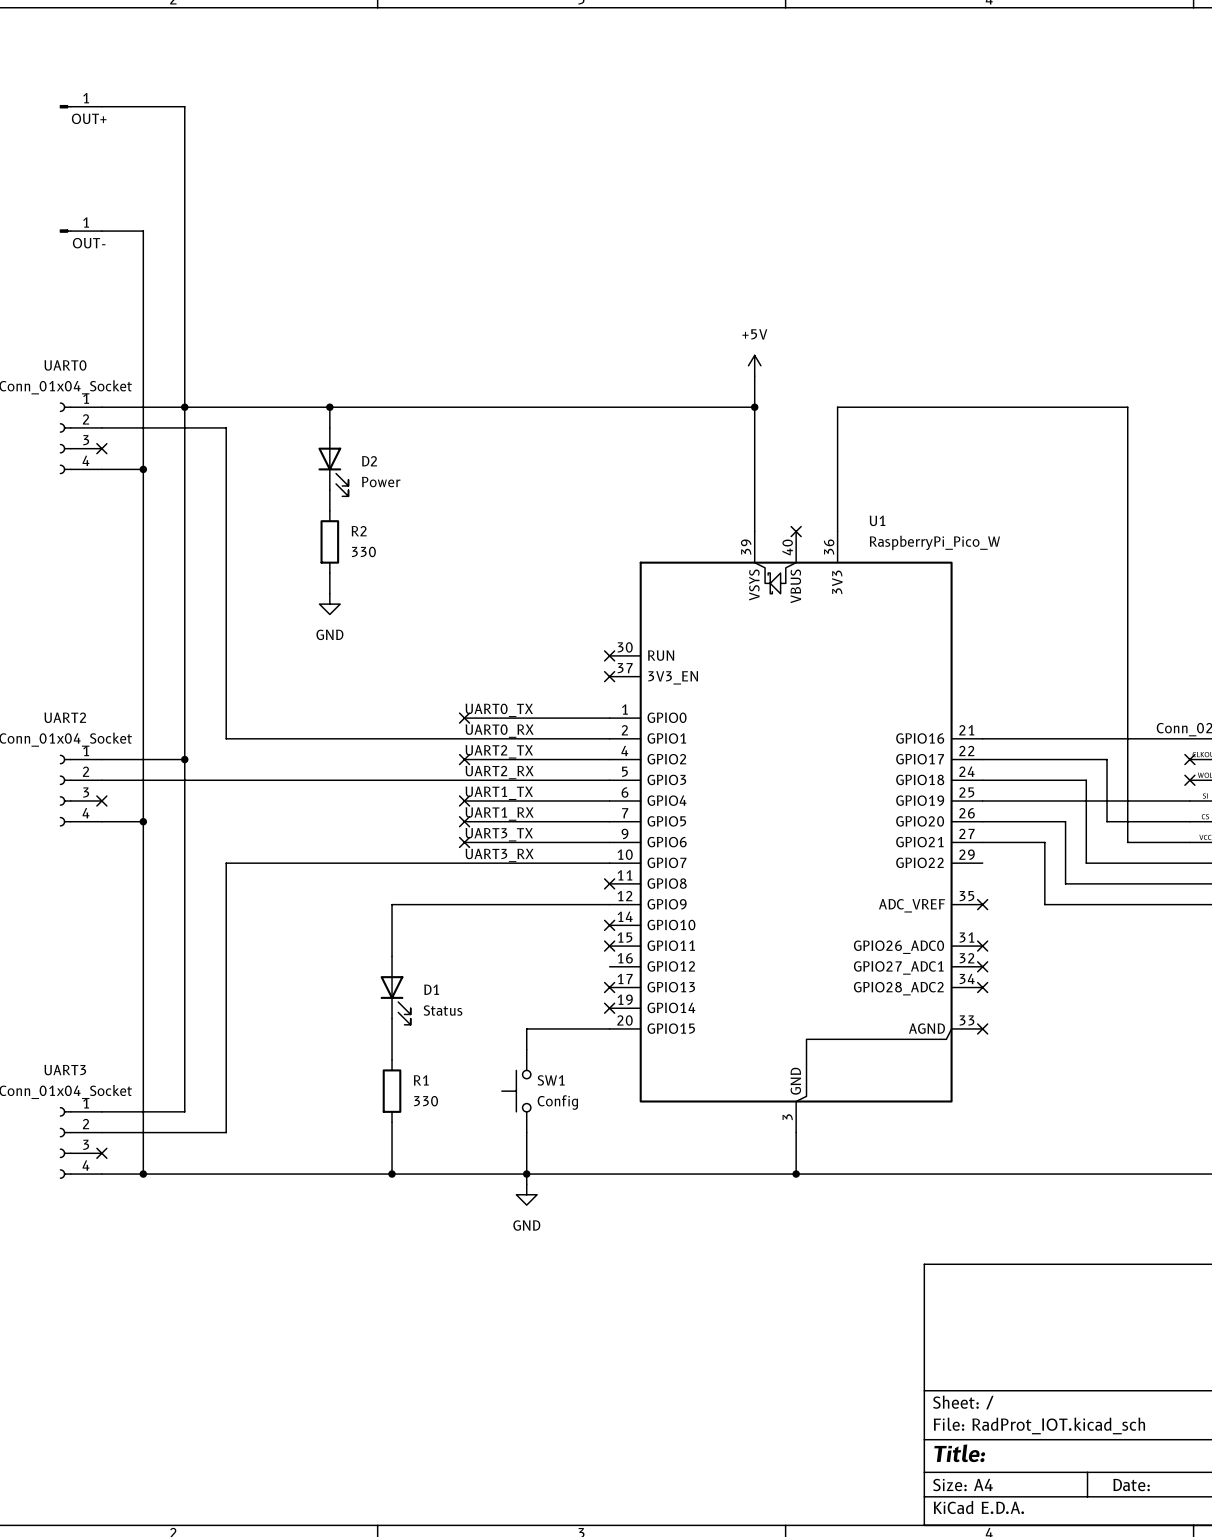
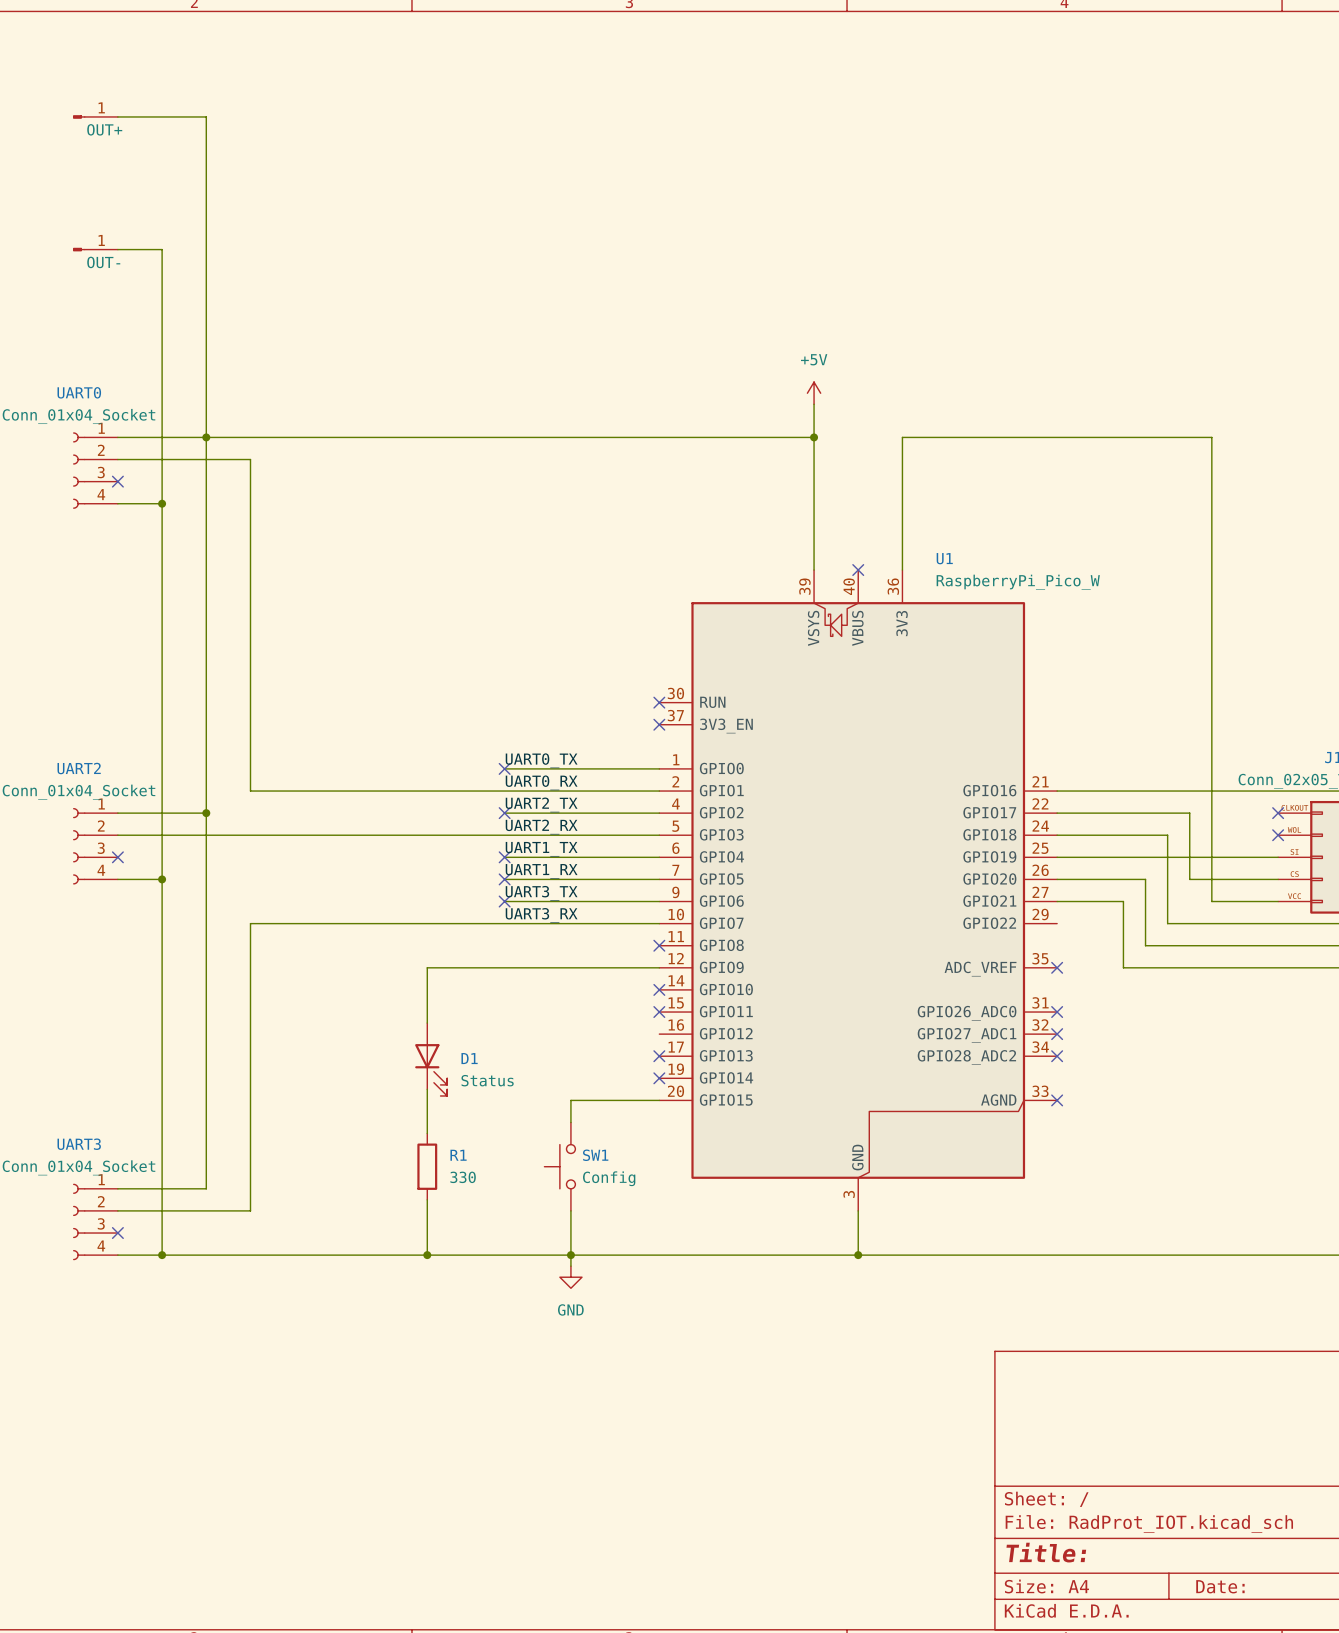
wire: (329, 407) (329, 427) -> none
junction: (329, 407) -> none
D2: Power (333, 462) -> none
wire: (329, 490) (329, 510) -> none
R2: 330 (329, 541) -> none
wire: (329, 573) (329, 593) -> none
power symbol: GND (329, 604) -> none

